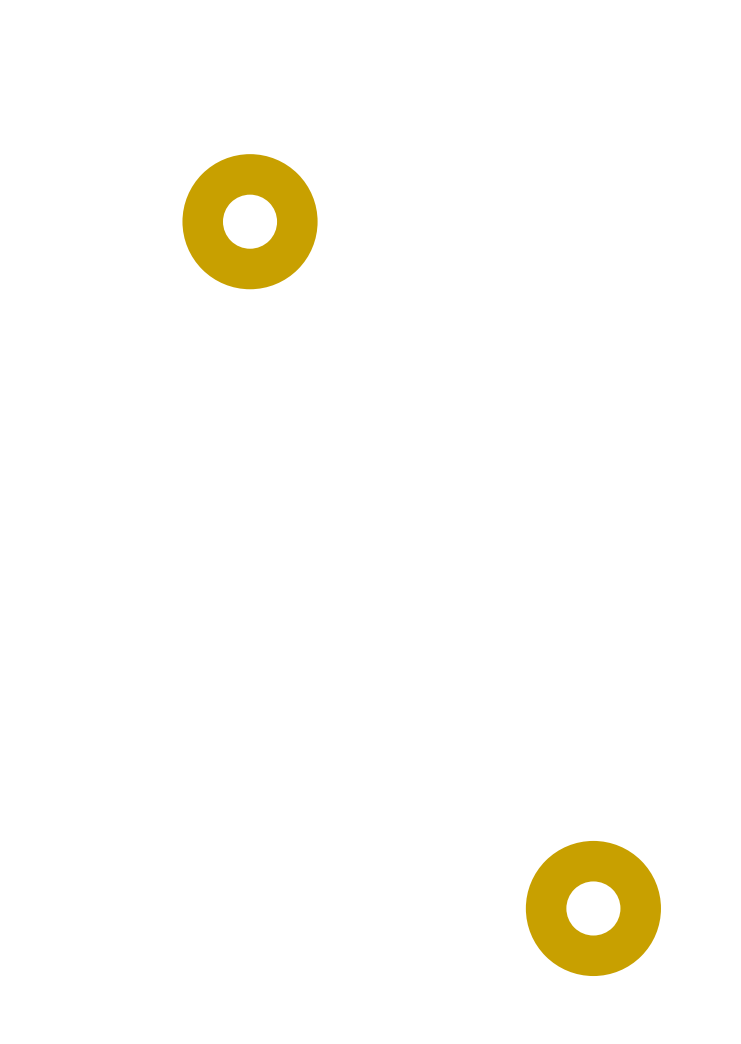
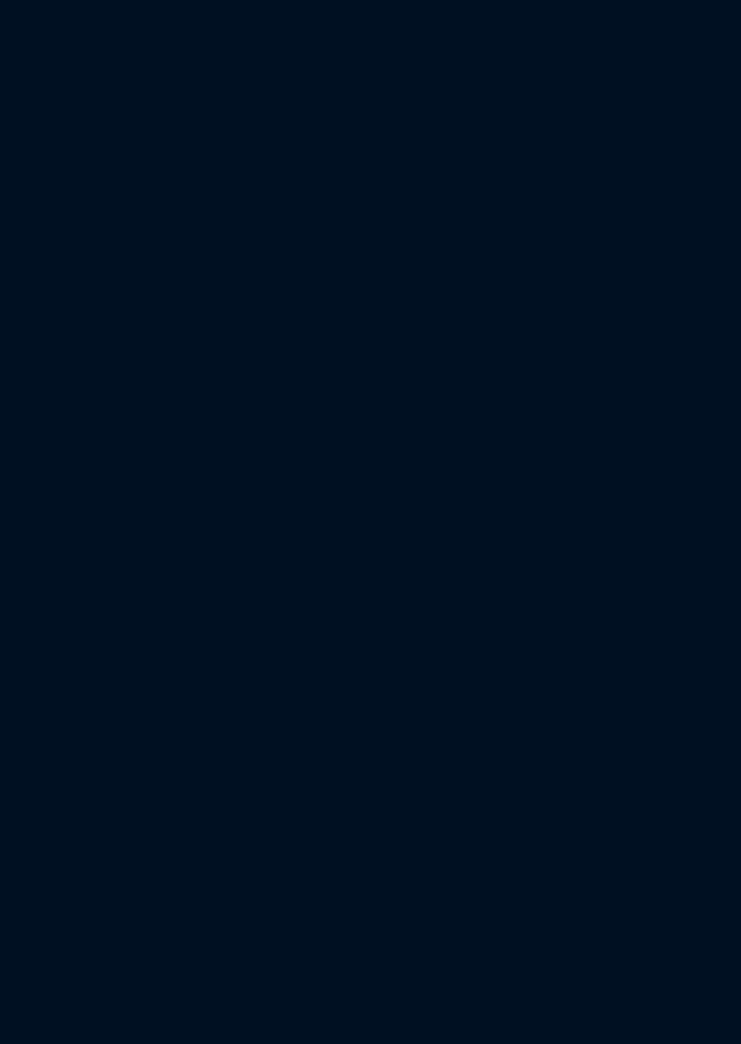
part: (250, 221) -> none
part: (593, 908) -> none

